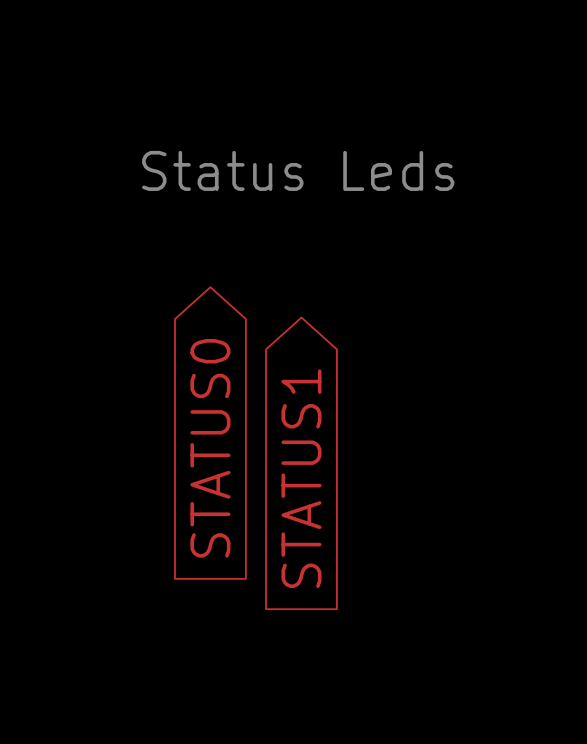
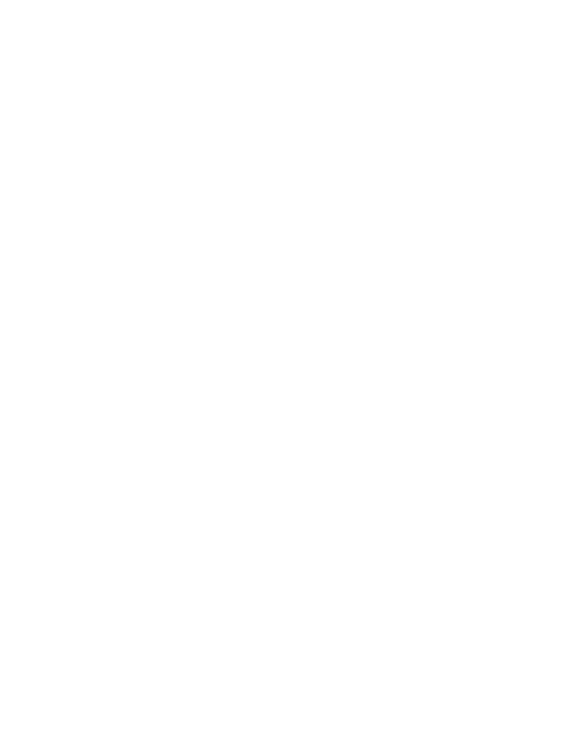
text: Status Leds (298, 170) -> none
global label: STATUS0 (210, 448) -> none
global label: STATUS1 (301, 478) -> none

